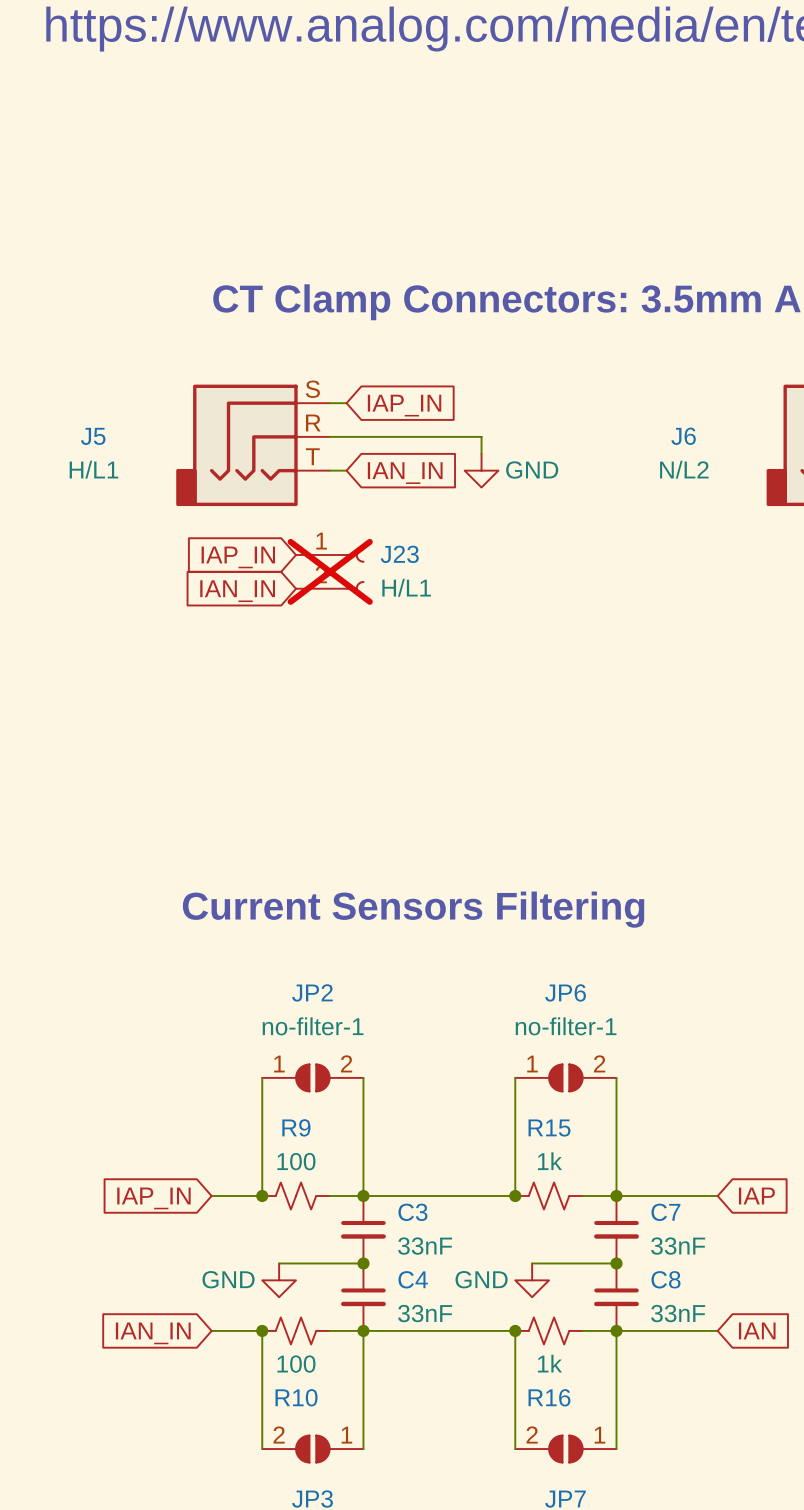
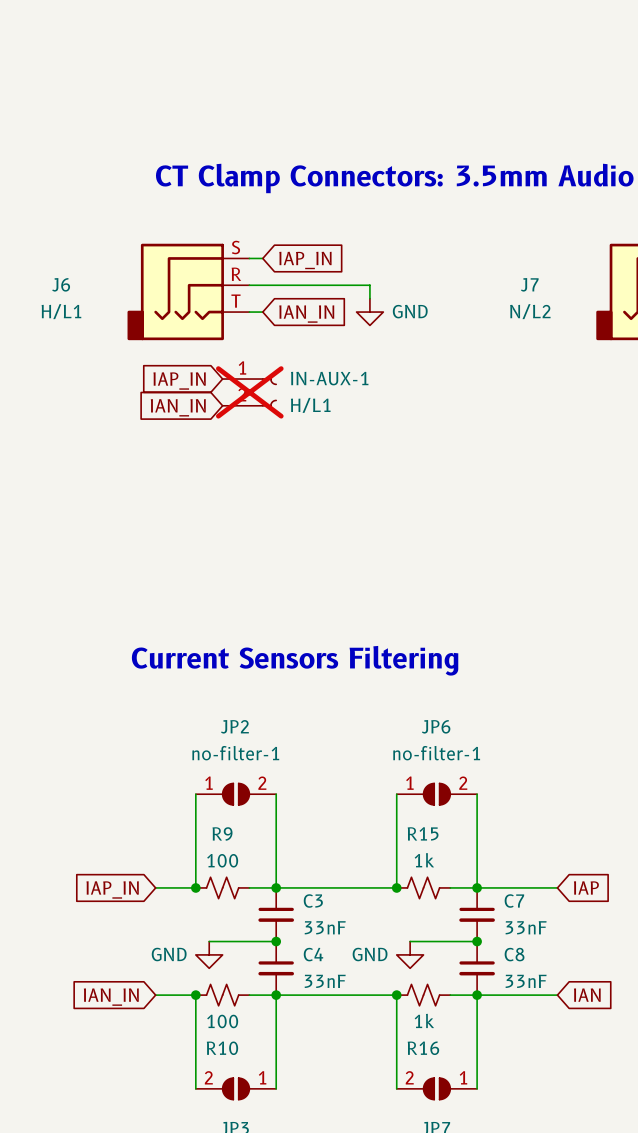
J5 name: J5 (93, 436) -> J6 (61, 284)
J6 name: J6 (683, 436) -> J7 (529, 284)
J23 name: J23 (399, 554) -> IN-AUX-1 (329, 378)

